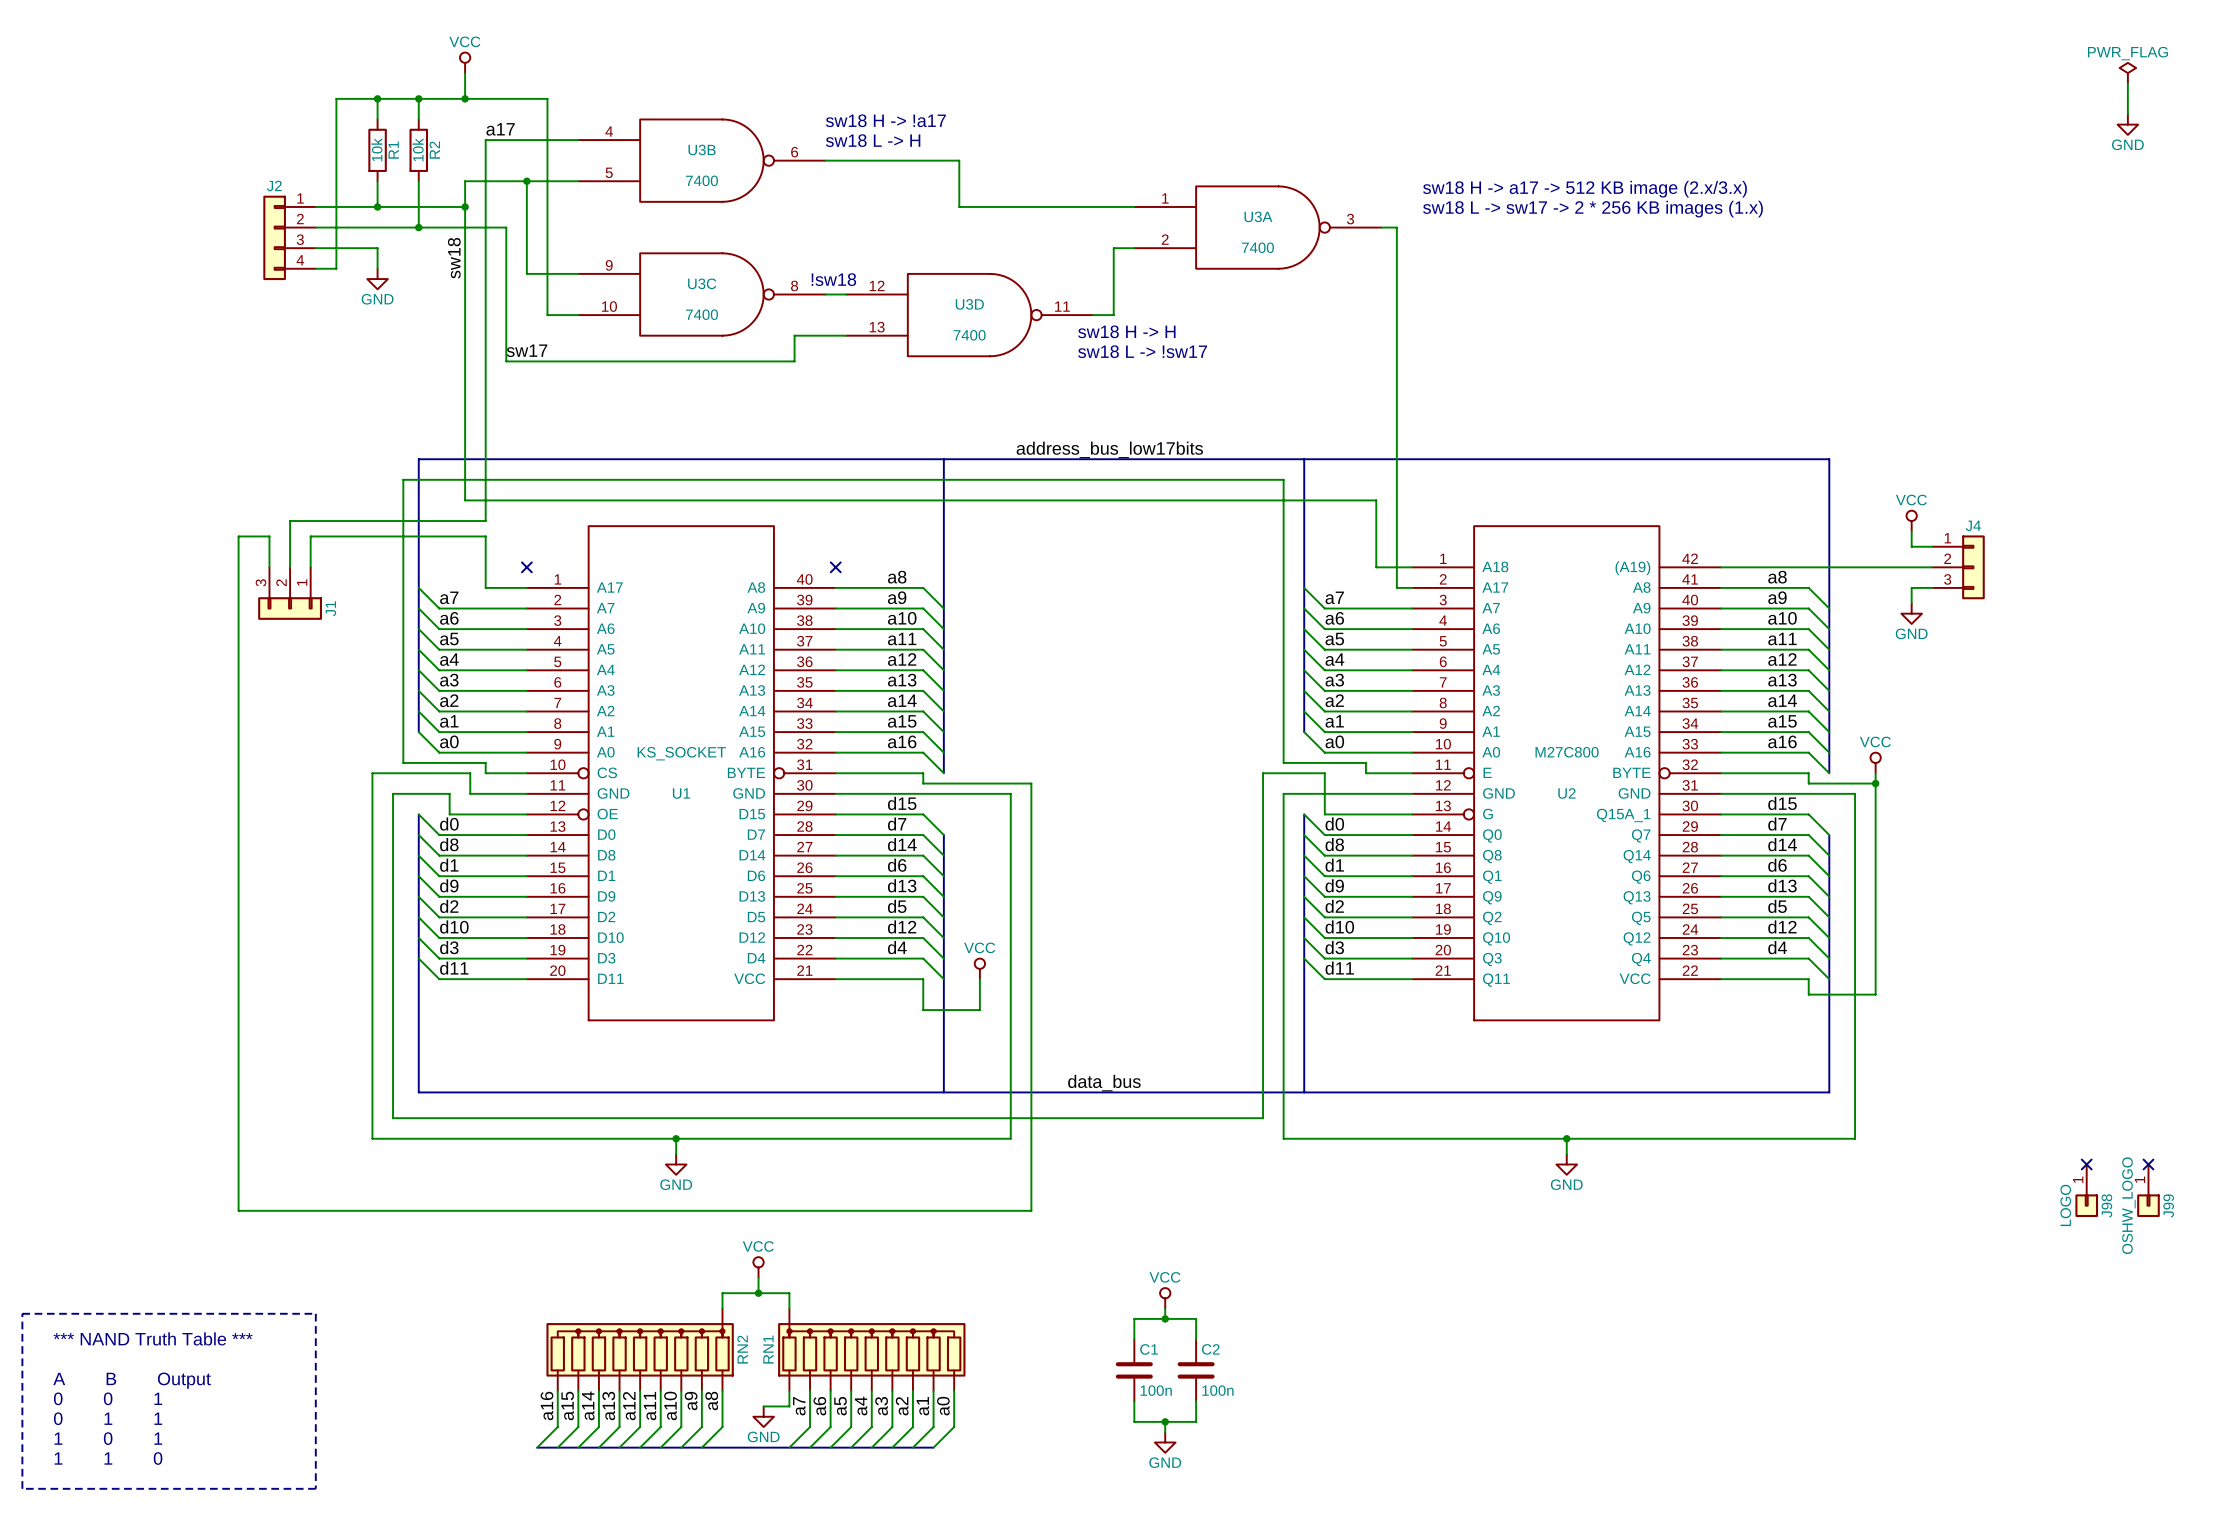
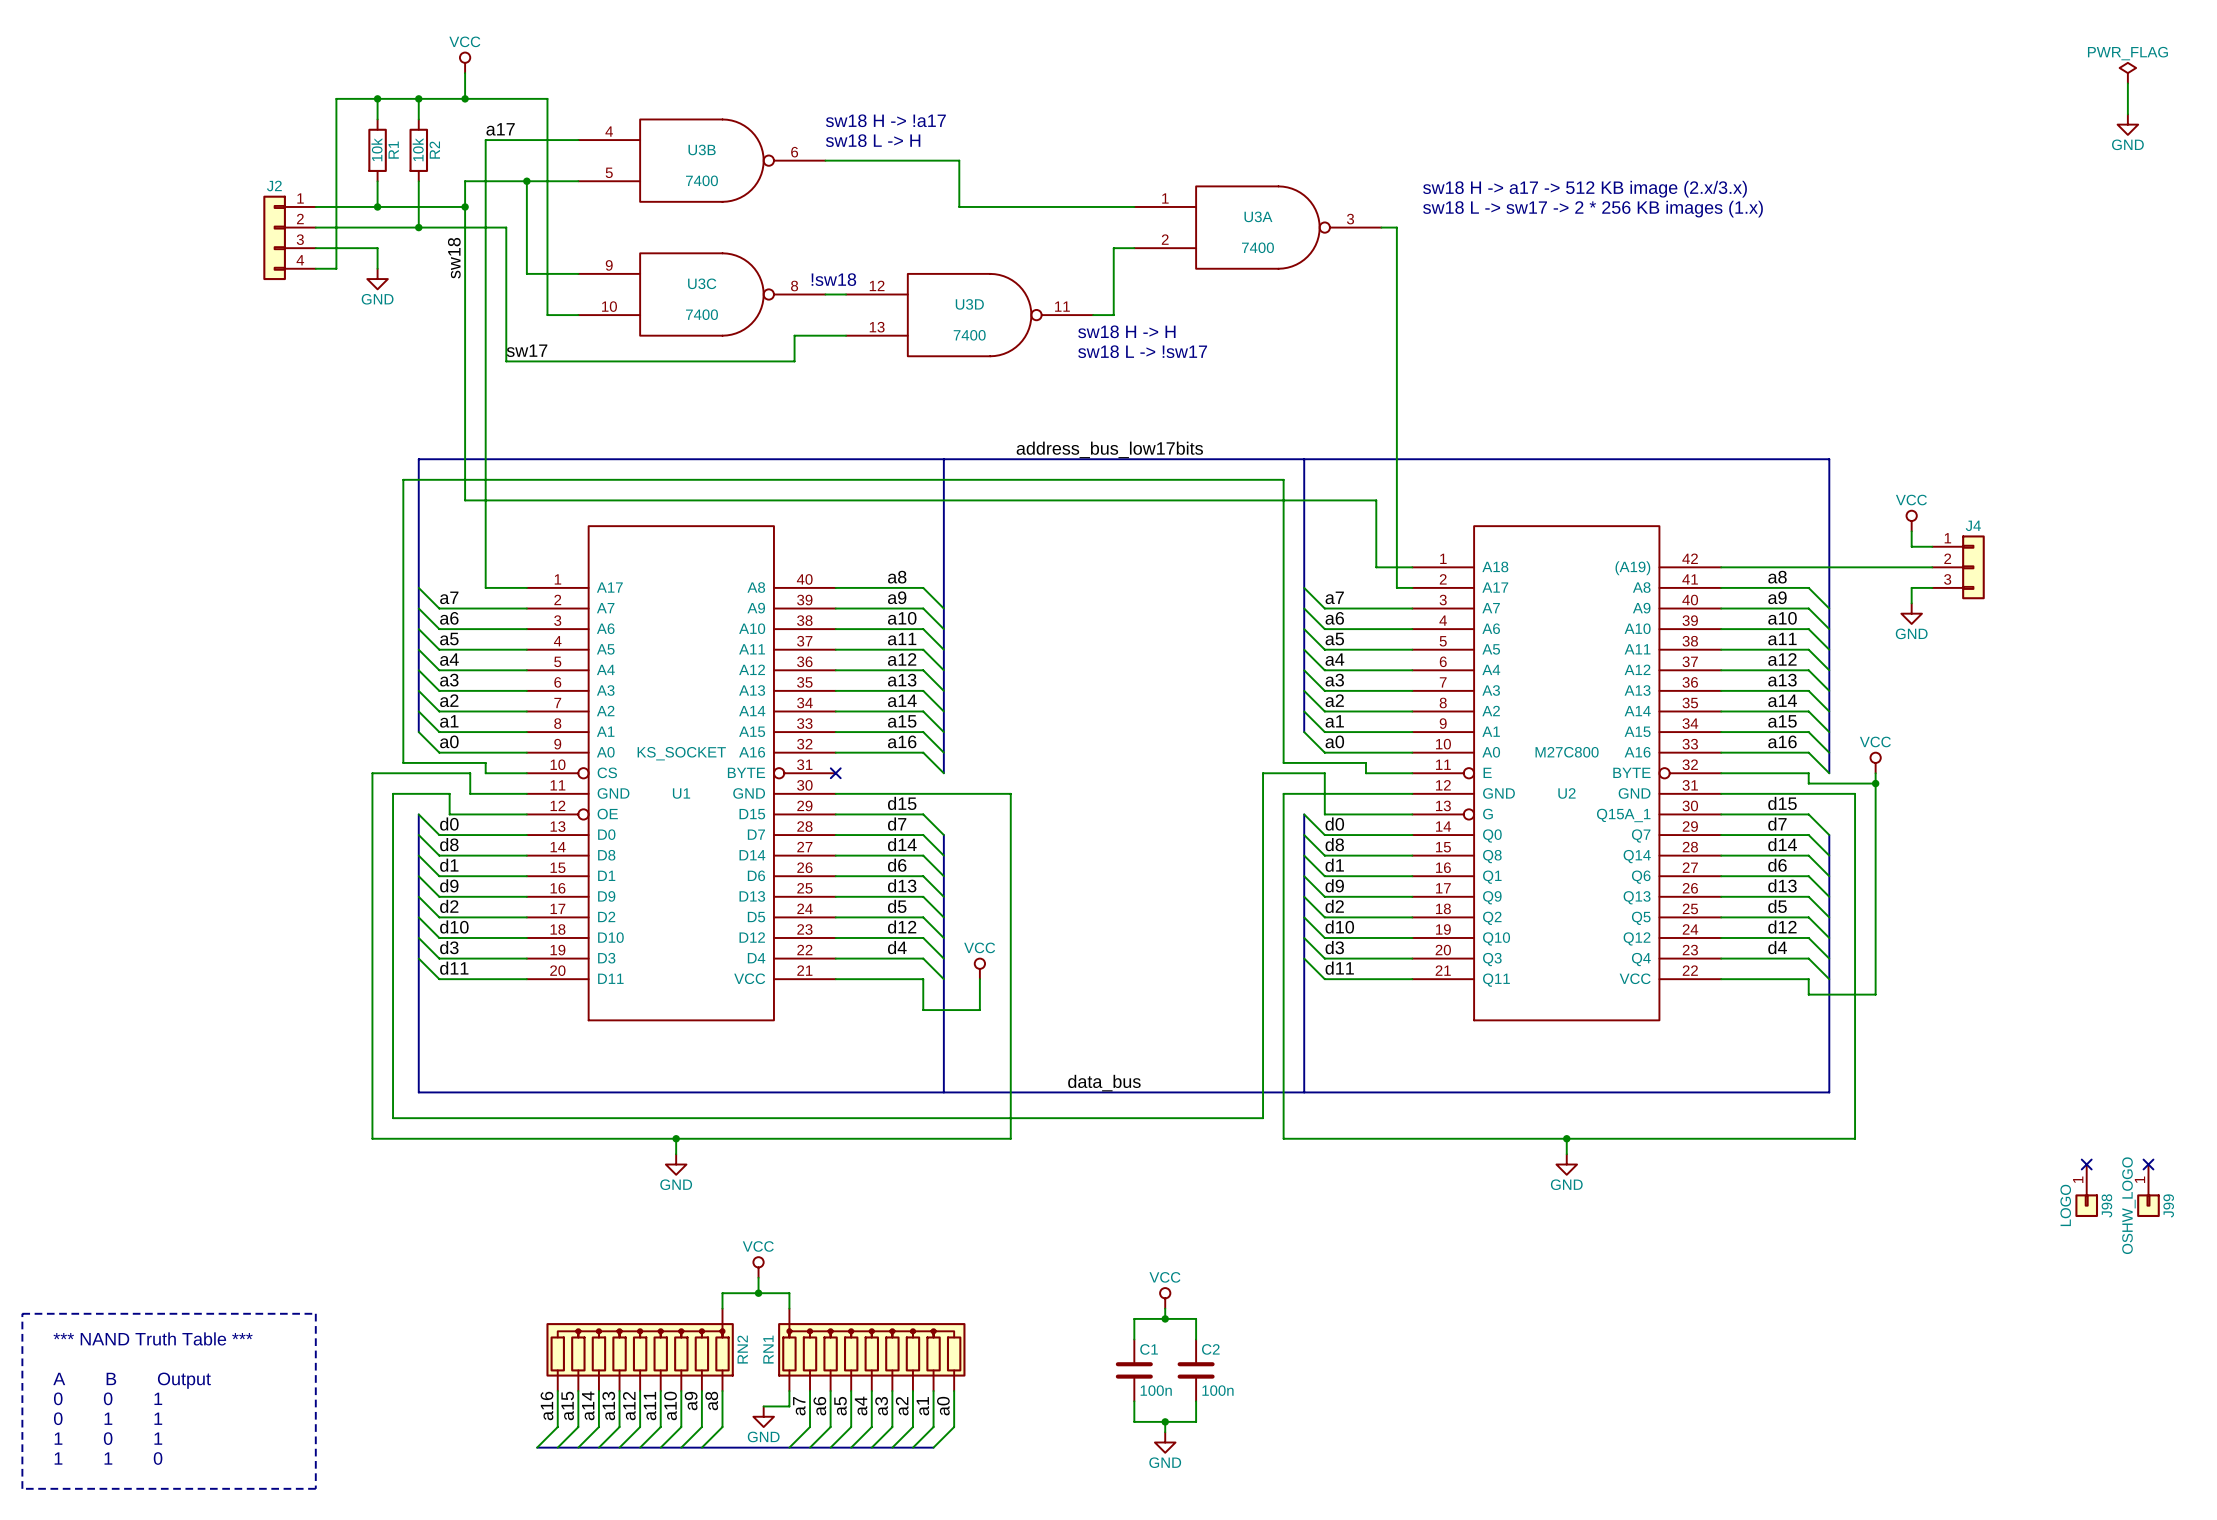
wire: (485, 521) (290, 521) (290, 567) -> none
wire: (485, 536) (310, 536) (310, 567) -> (485, 536) (485, 521)
wire: (269, 567) (269, 536) (238, 536) (238, 1210) (1031, 1210) (1031, 783) (923, 783) (923, 773) (835, 773) -> none
no-connect mark: (526, 567) -> none
no-connect mark: (835, 567) -> none
J1: (290, 593) -> none
no-connect mark: none -> (835, 773)

